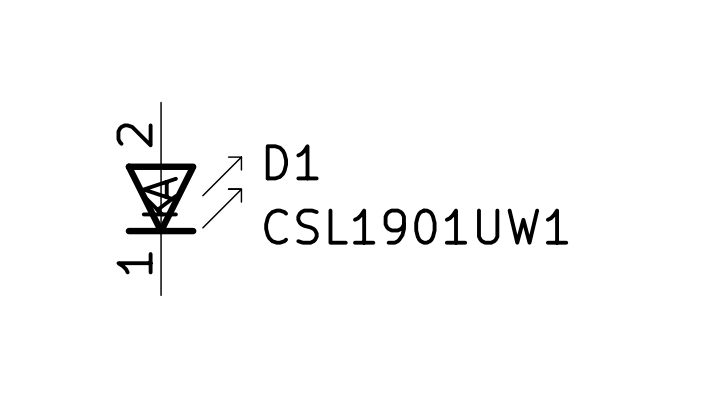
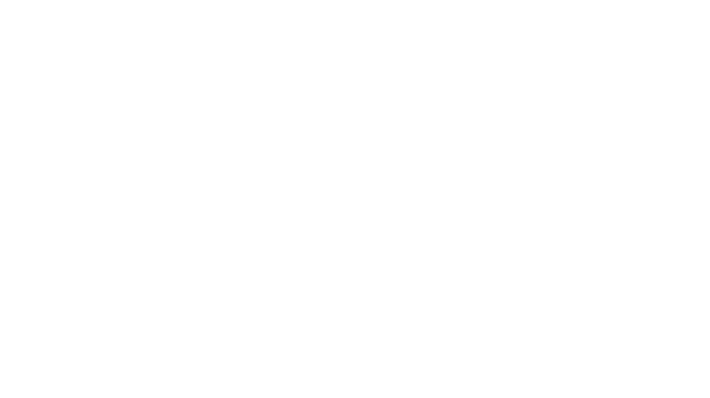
D1: CSL1901UW1 (183, 198) -> none

